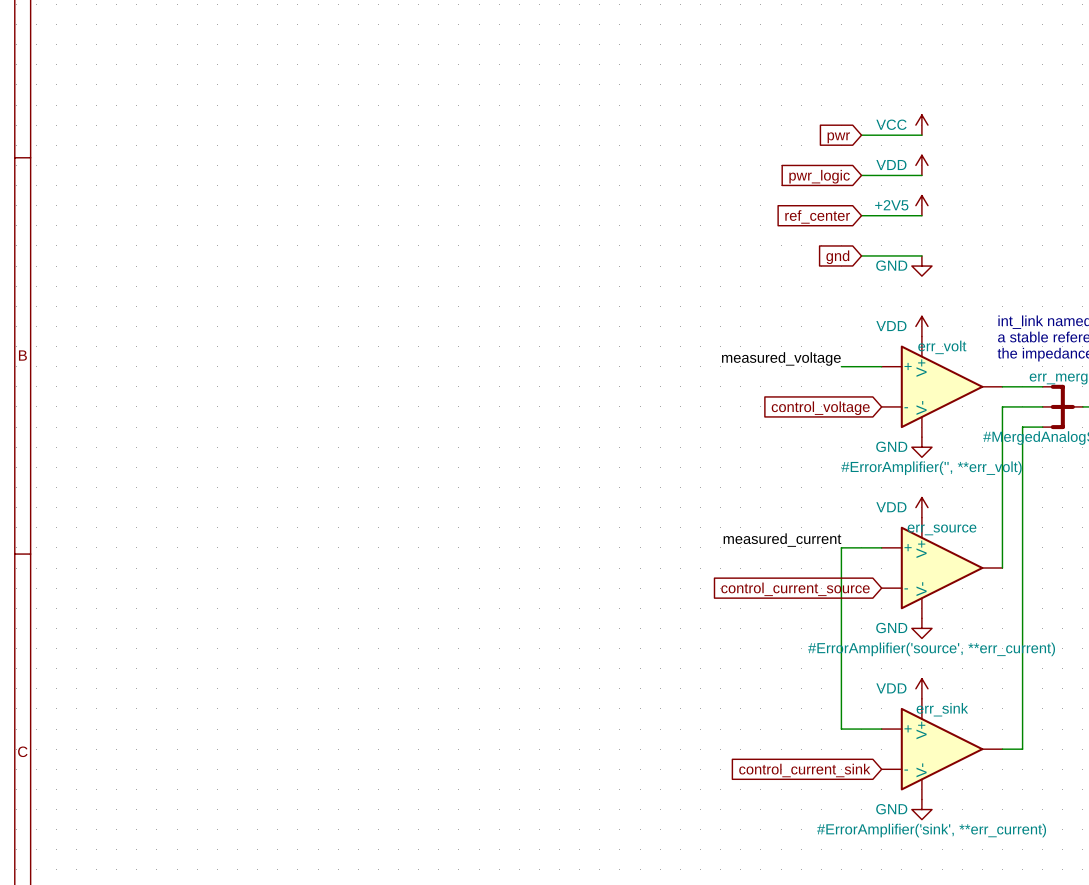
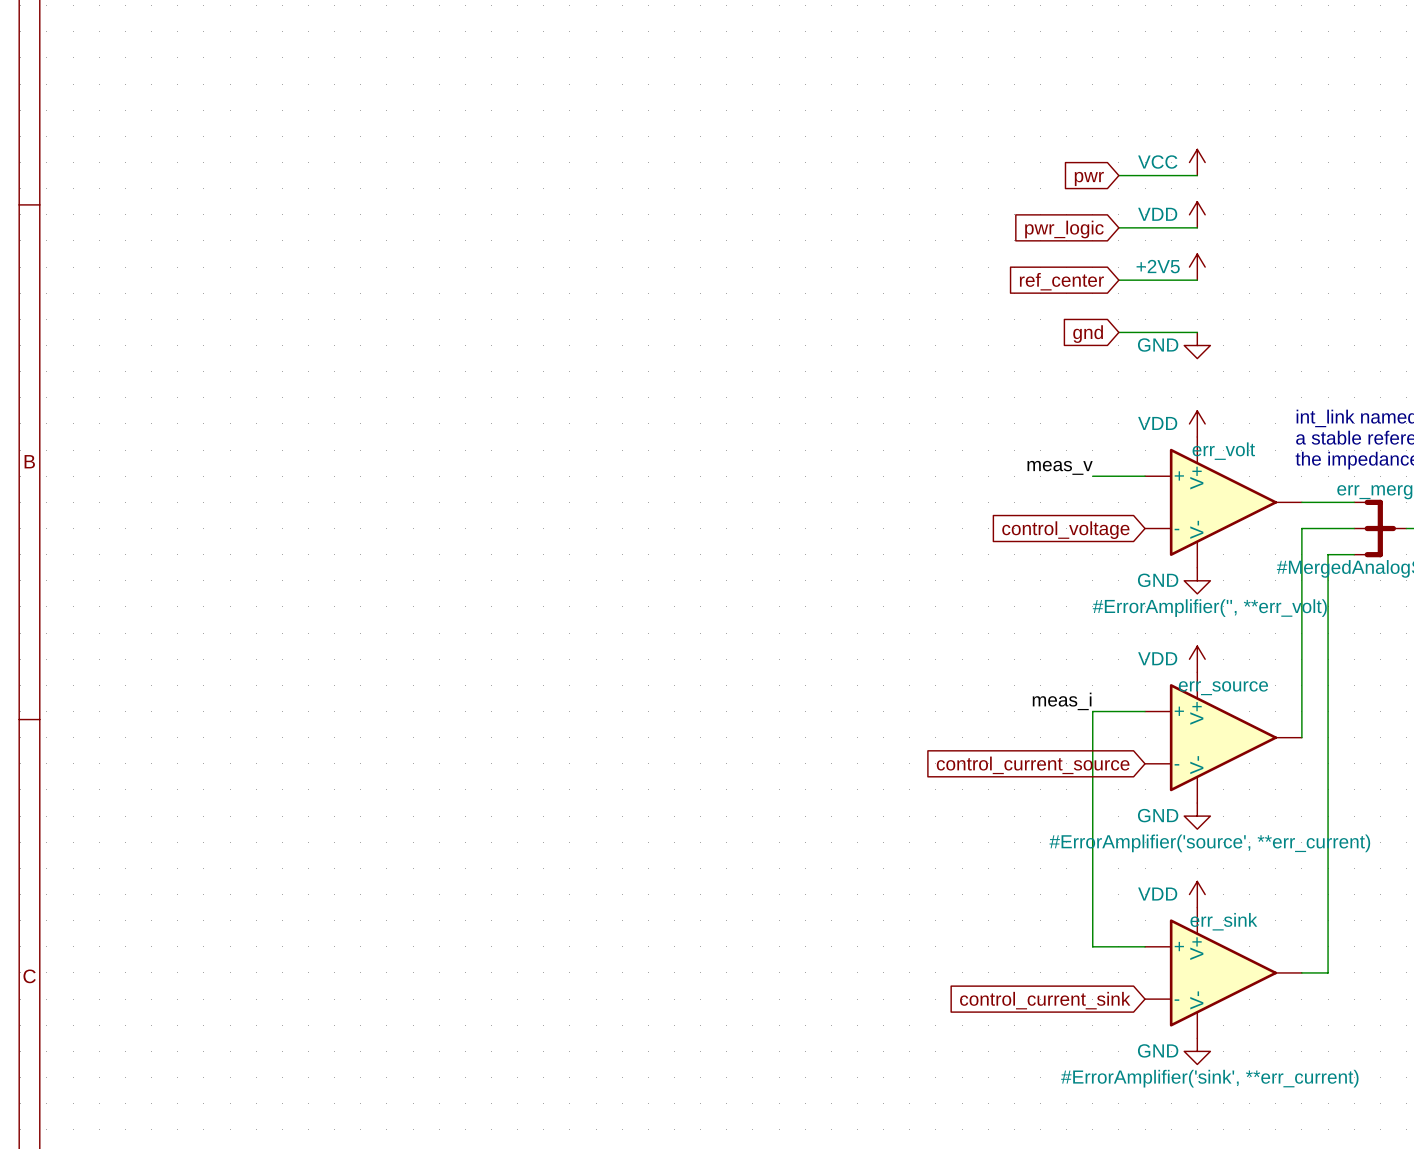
label: measured_voltage (781, 358) -> meas_v (1060, 467)
label: measured_current (782, 540) -> meas_i (1062, 701)

